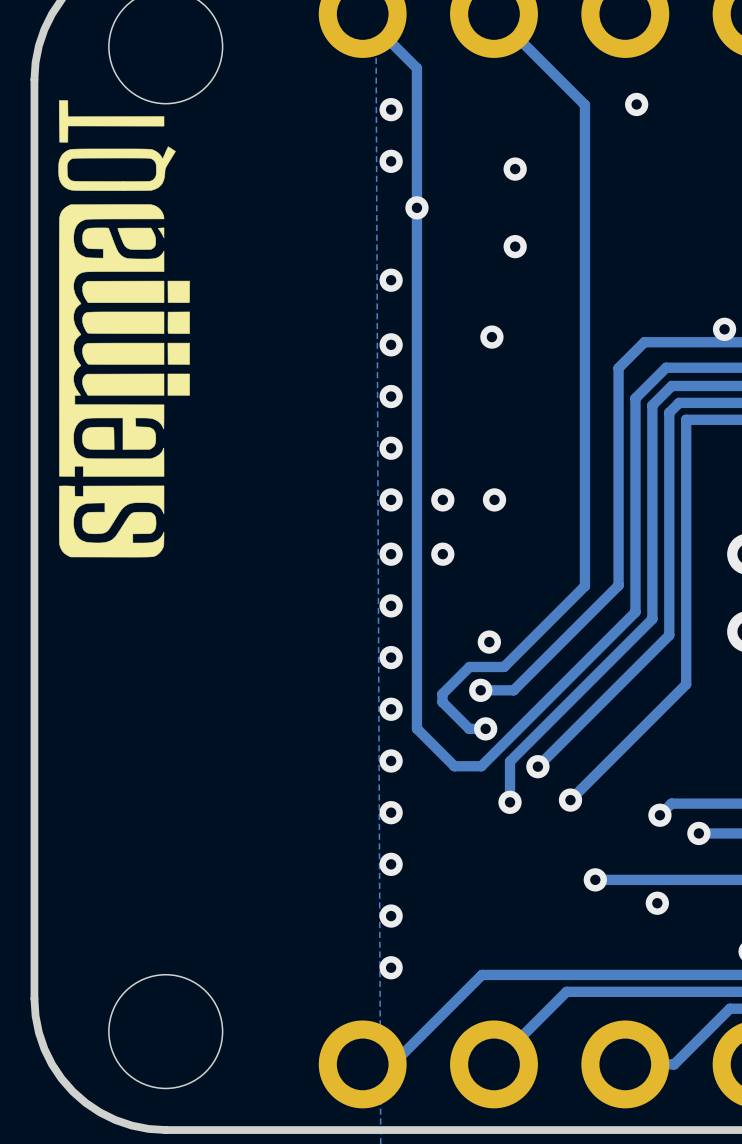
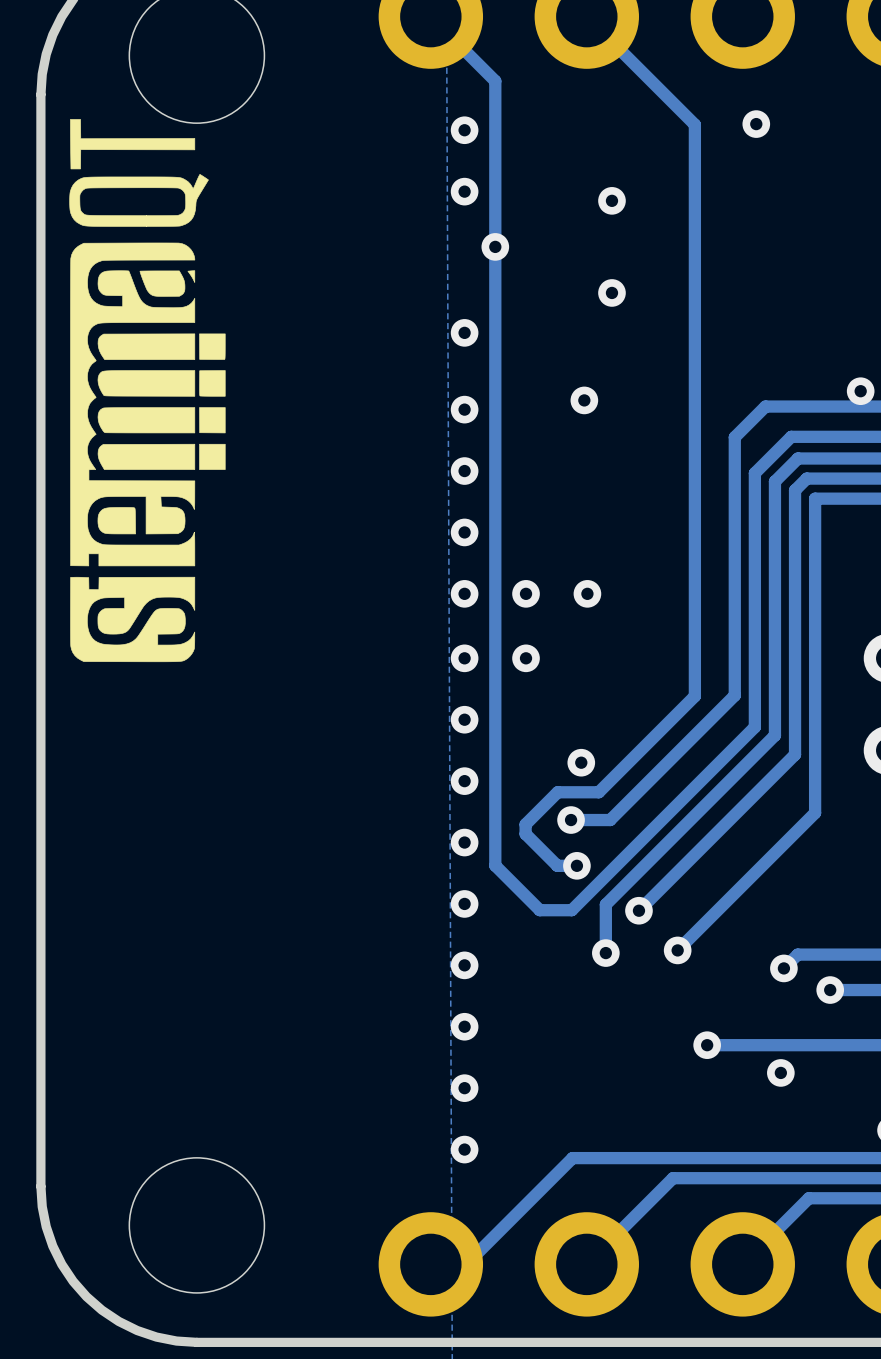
track: (729, 1008) (674, 1064) (625, 1064) -> (867, 1198) (808, 1198) (742, 1264)

